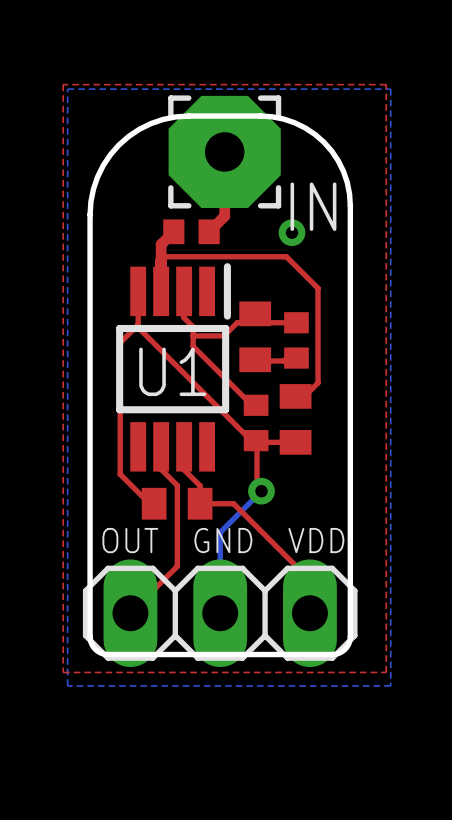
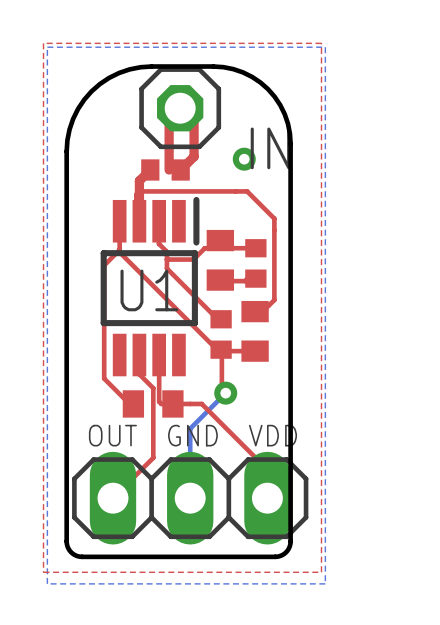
top zone outline: (63, 84) (63, 672) (386, 672) (386, 84) (372, 84) -> (55, 43) (43, 43) (43, 572) (321, 572) (321, 43)
bottom zone outline: (67, 89) (67, 685) (390, 685) (390, 89) (377, 89) -> (58, 47) (47, 47) (47, 583) (325, 583) (325, 47)
part footprint: [168, 95, 282, 209] -> [139, 67, 222, 150]
board edge: (188, 116) (260, 116) (283, 119) (294, 122) (315, 134) (324, 142) (338, 160) (347, 182) (350, 205) (350, 636) (346, 647) (337, 653) (108, 654) (97, 650) (90, 641) (90, 201) (93, 189) (103, 165) (118, 144) (139, 129) (151, 123) (175, 116) (188, 116) -> (151, 66) (119, 72) (91, 91) (78, 108) (67, 140) (67, 545) (72, 553) (82, 556) (279, 556) (287, 550) (290, 541) (290, 143) (287, 123) (280, 105) (267, 89) (242, 72) (213, 66) (151, 66)
top track: none -> (180, 108) (169, 119) (169, 169)
via position: (292, 232) -> (244, 159)
top track: (184, 469) (200, 485) (200, 503) -> (159, 374) (159, 401) (161, 403) (172, 403)

